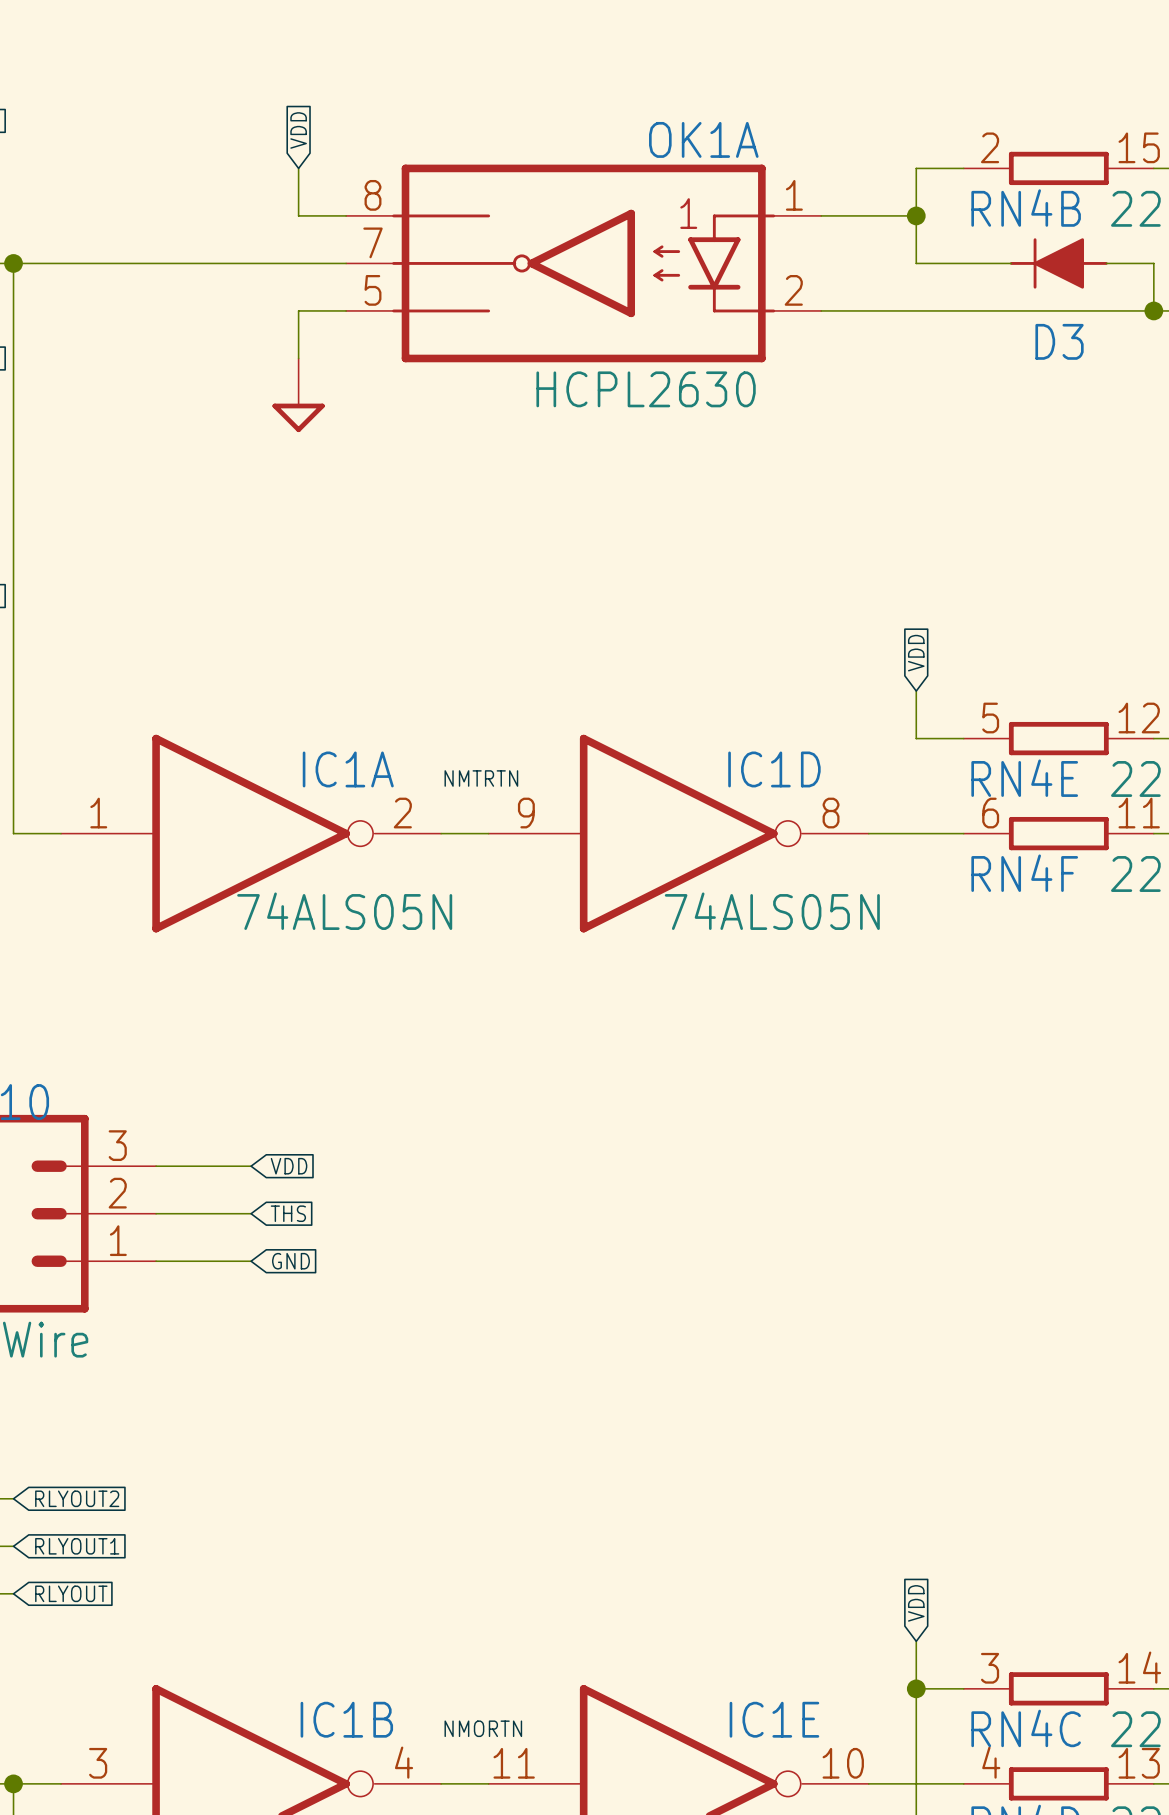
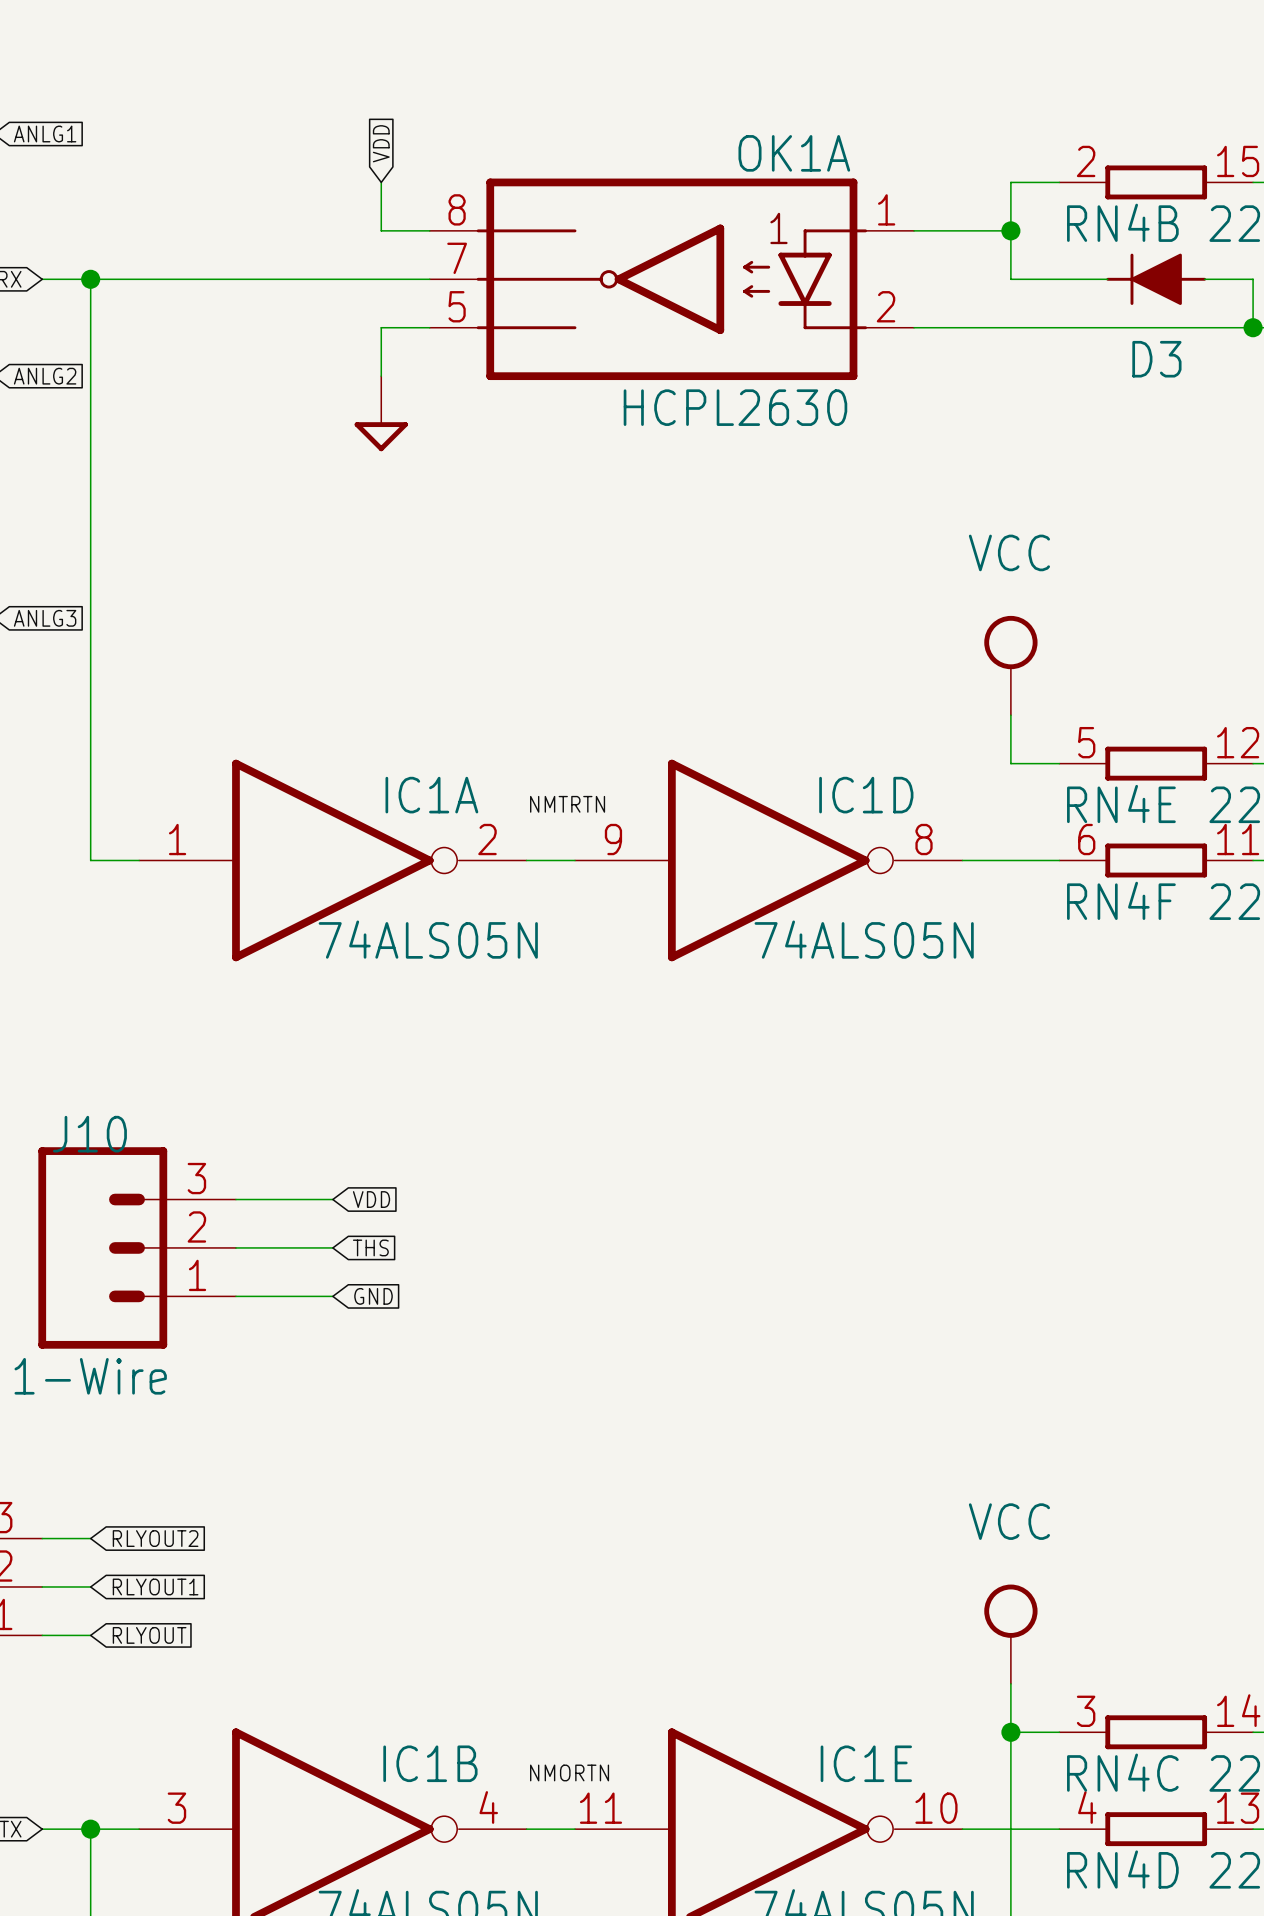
power symbol: none -> VCC (1010, 665)
global label: VDD (916, 653) -> none
power symbol: none -> VCC (1010, 1634)
global label: VDD (916, 1603) -> none

